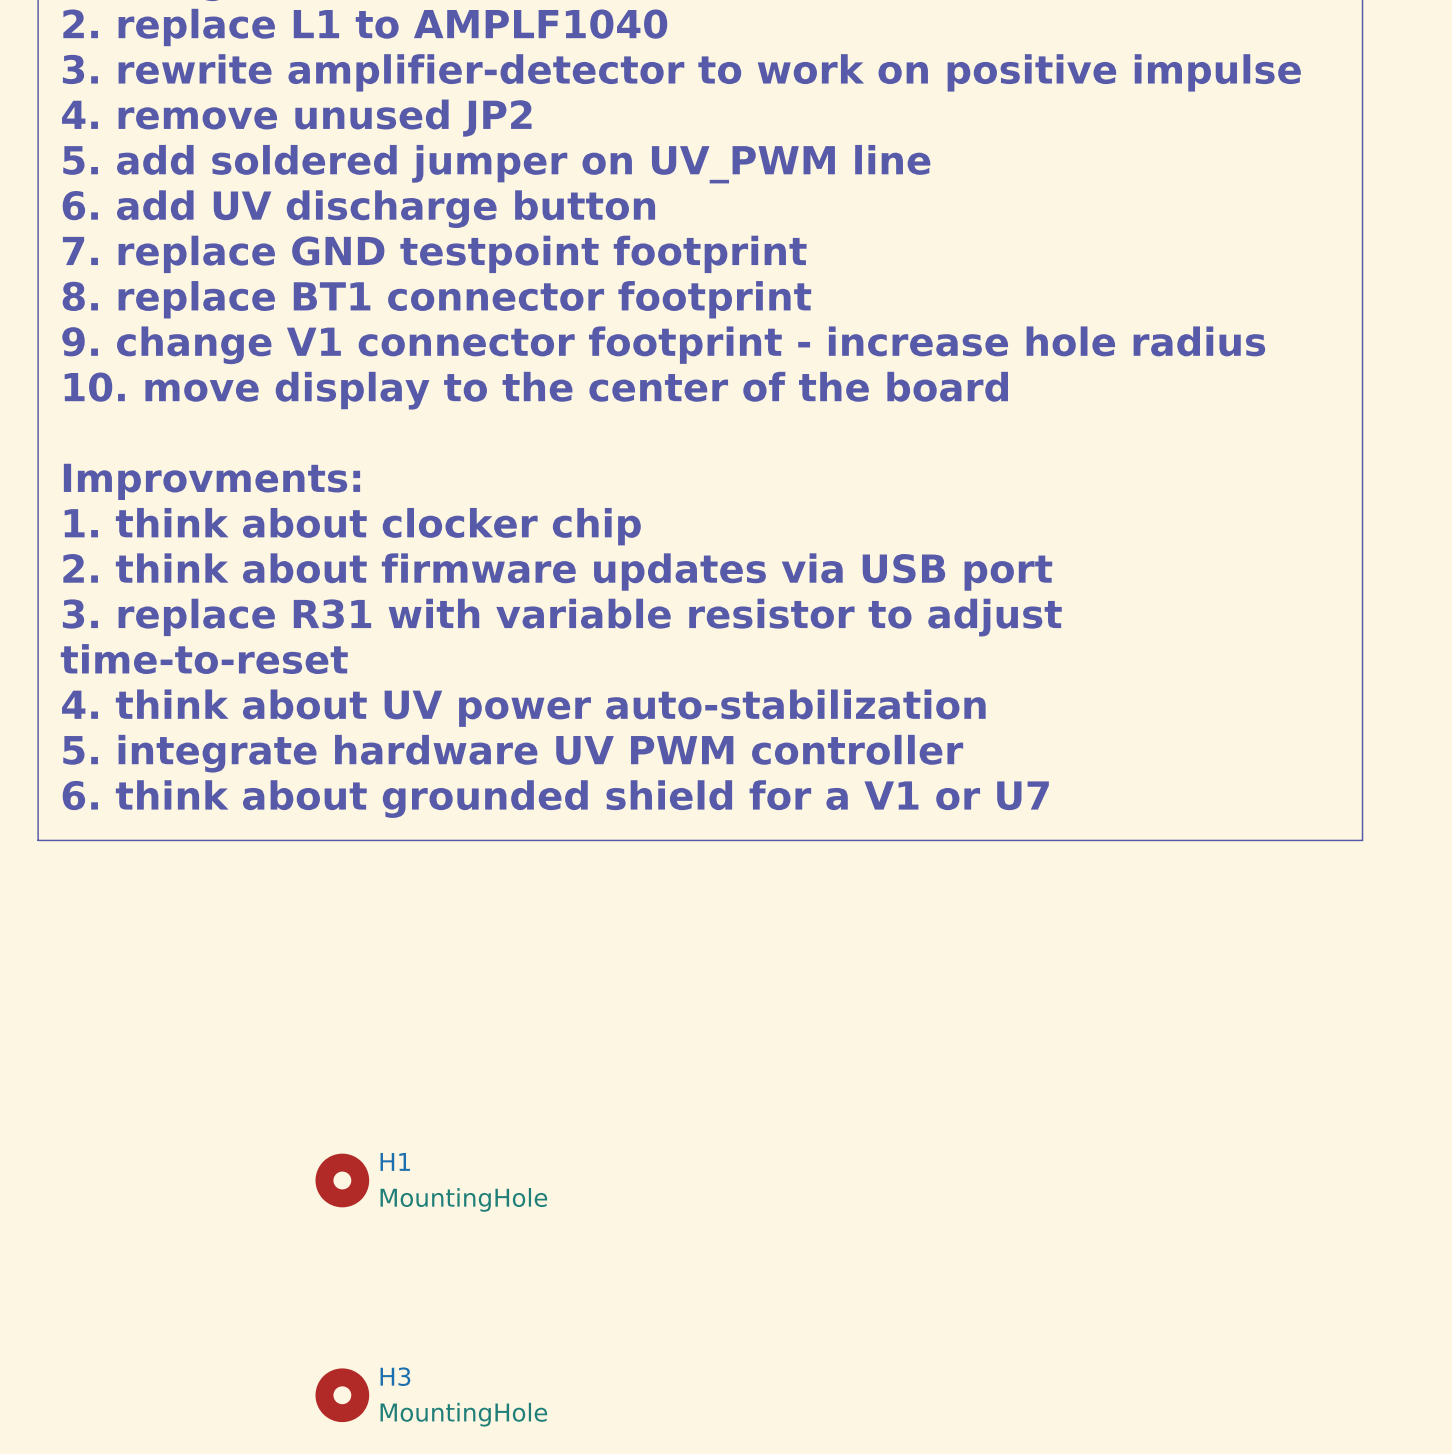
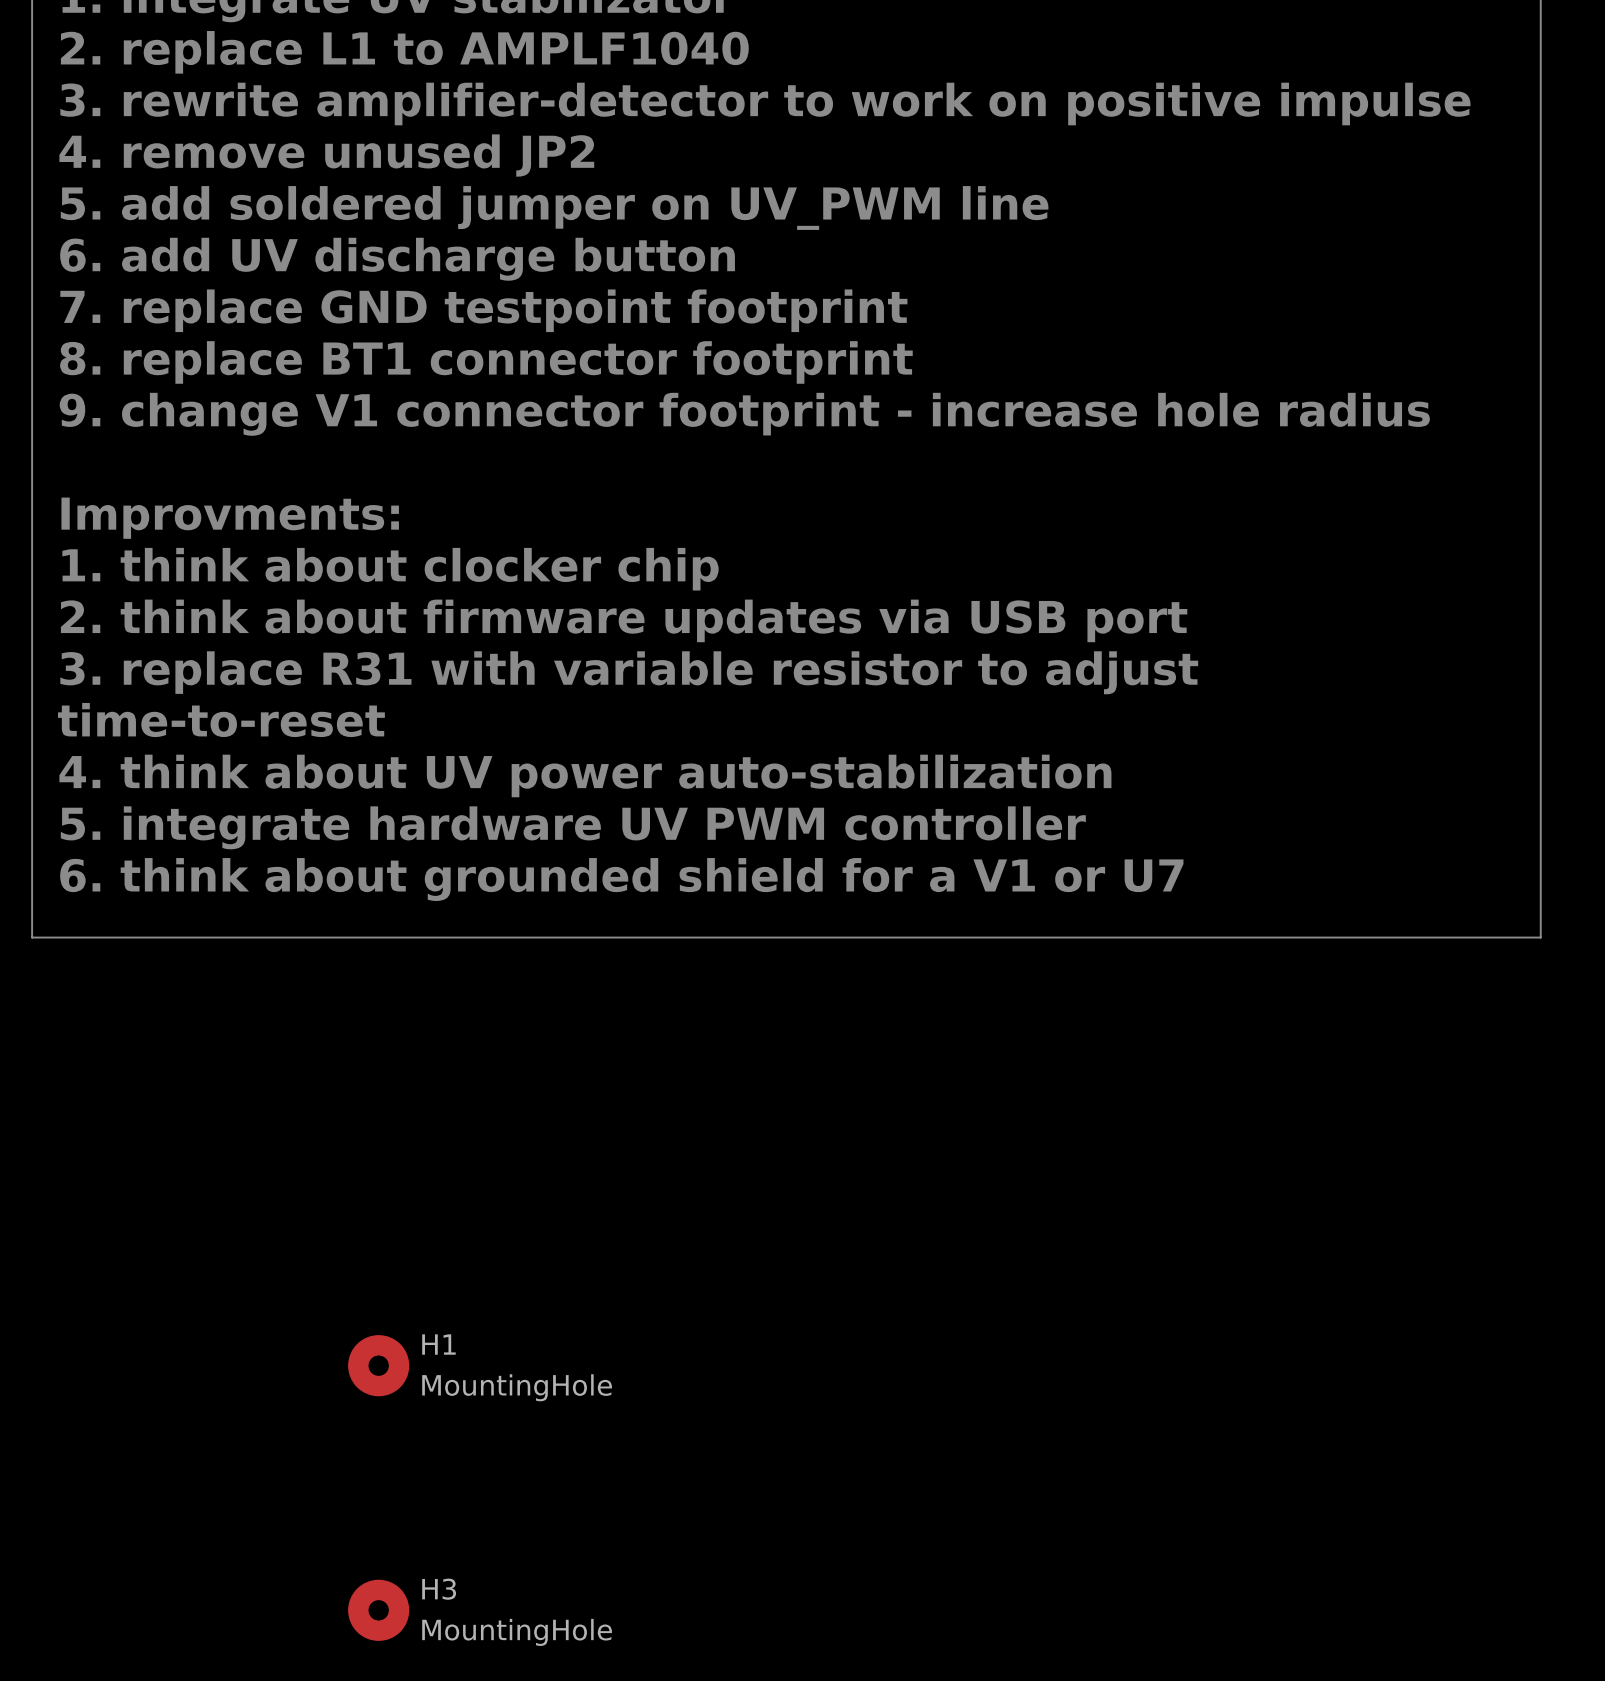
text: 10. move display to the center of the board (536, 390) -> none
text: none -> Improvments: (230, 518)
text: Improvments: (211, 481) -> 1. think about clocker chip (390, 569)
text: 1. think about clocker chip (352, 526) -> 2. think about firmware updates via USB port (624, 620)
text: 2. think about firmware updates via USB port (557, 572) -> 3. replace R31 with variable resistor to adjust (629, 672)
text: 3. replace R31 with variable resistor to adjust (562, 617) -> time-to-reset (221, 720)
text: time-to-reset (204, 659) -> 4. think about UV power auto-stabilization (585, 775)
text: 4. think about UV power auto-stabilization (523, 708) -> 5. integrate hardware UV PWM controller (573, 827)
text: 5. integrate hardware UV PWM controller (513, 753) -> 6. think about grounded shield for a V1 or U7 (621, 879)
text: 6. think about grounded shield for a V1 or U7 (555, 799) -> none
line: (38, 804) (38, 840) (1362, 840) (1362, 804) -> (32, 937) (1540, 937)

